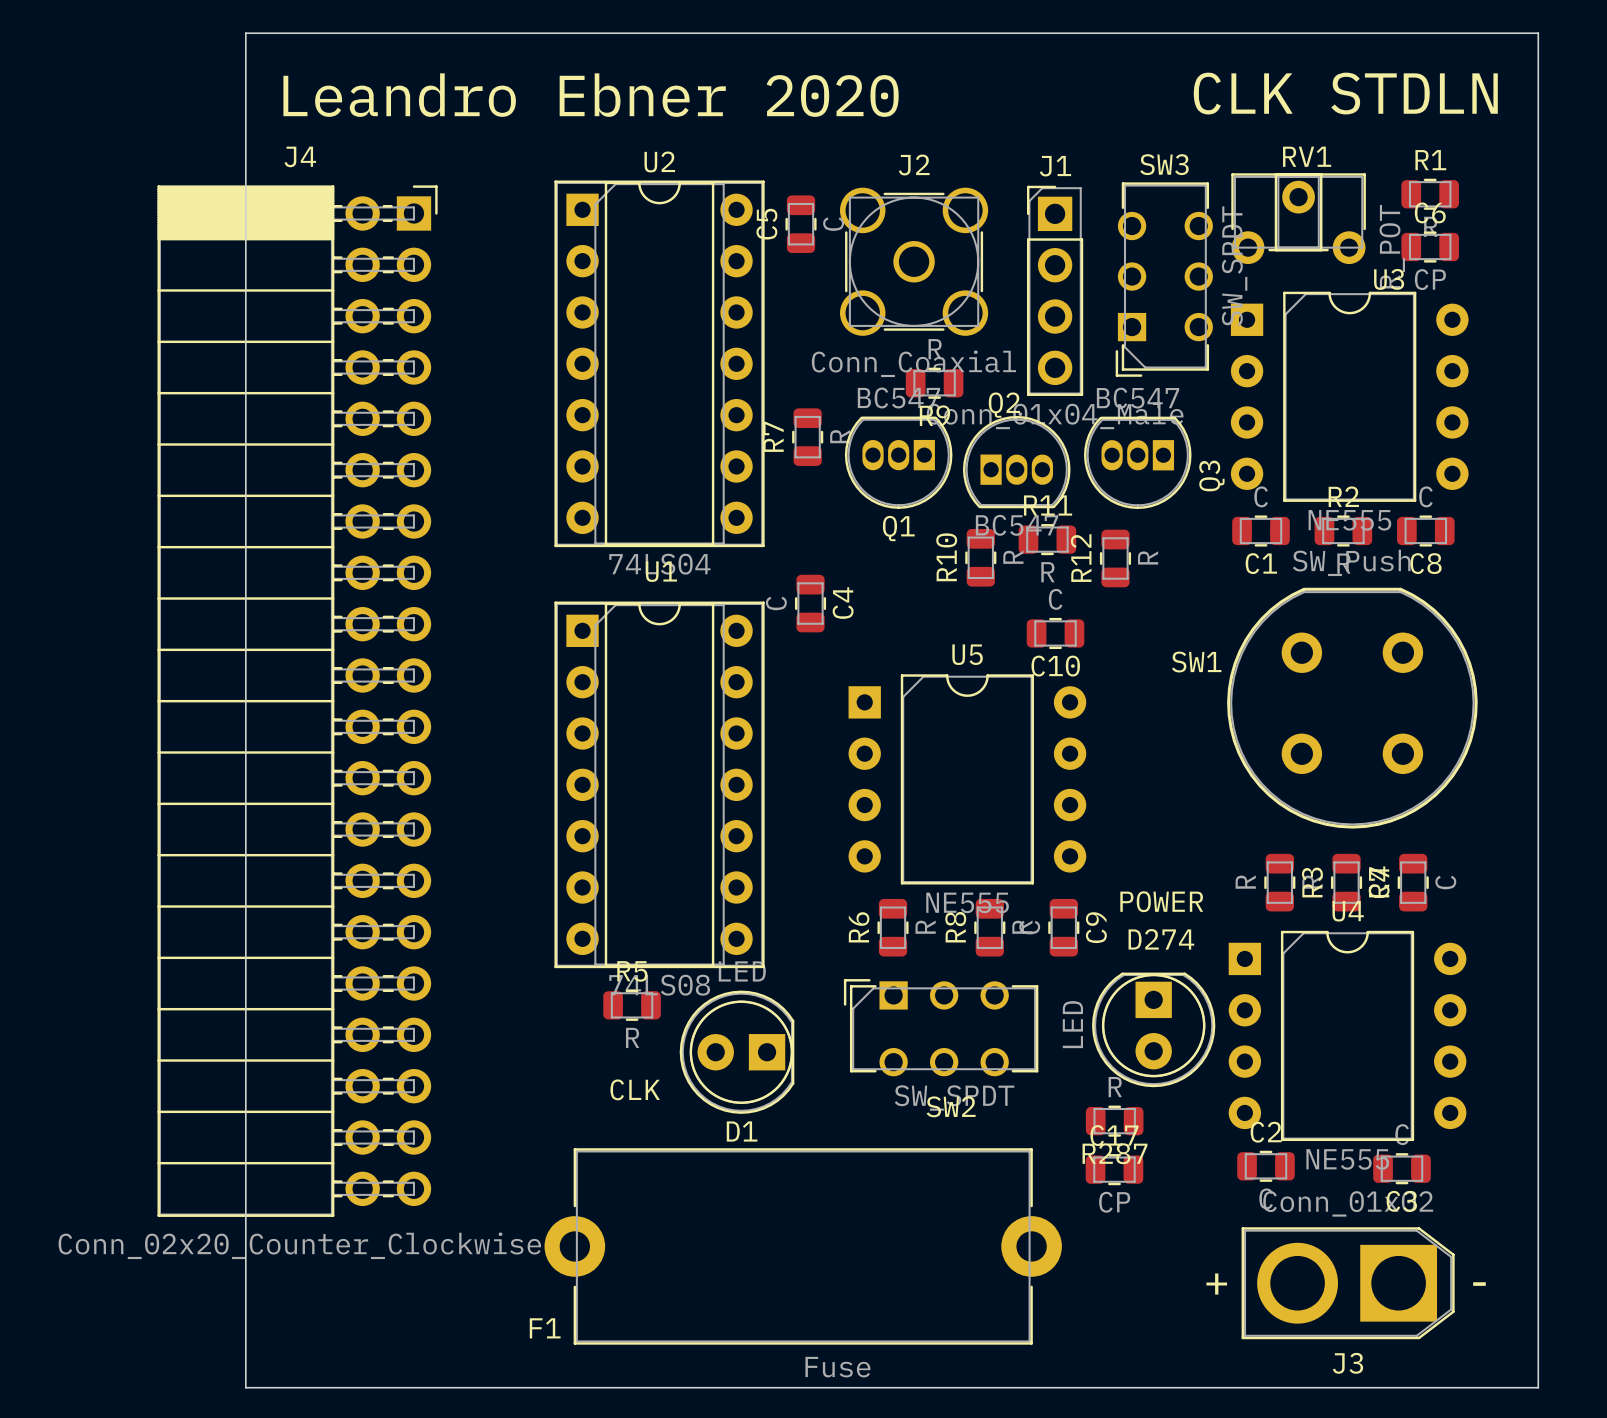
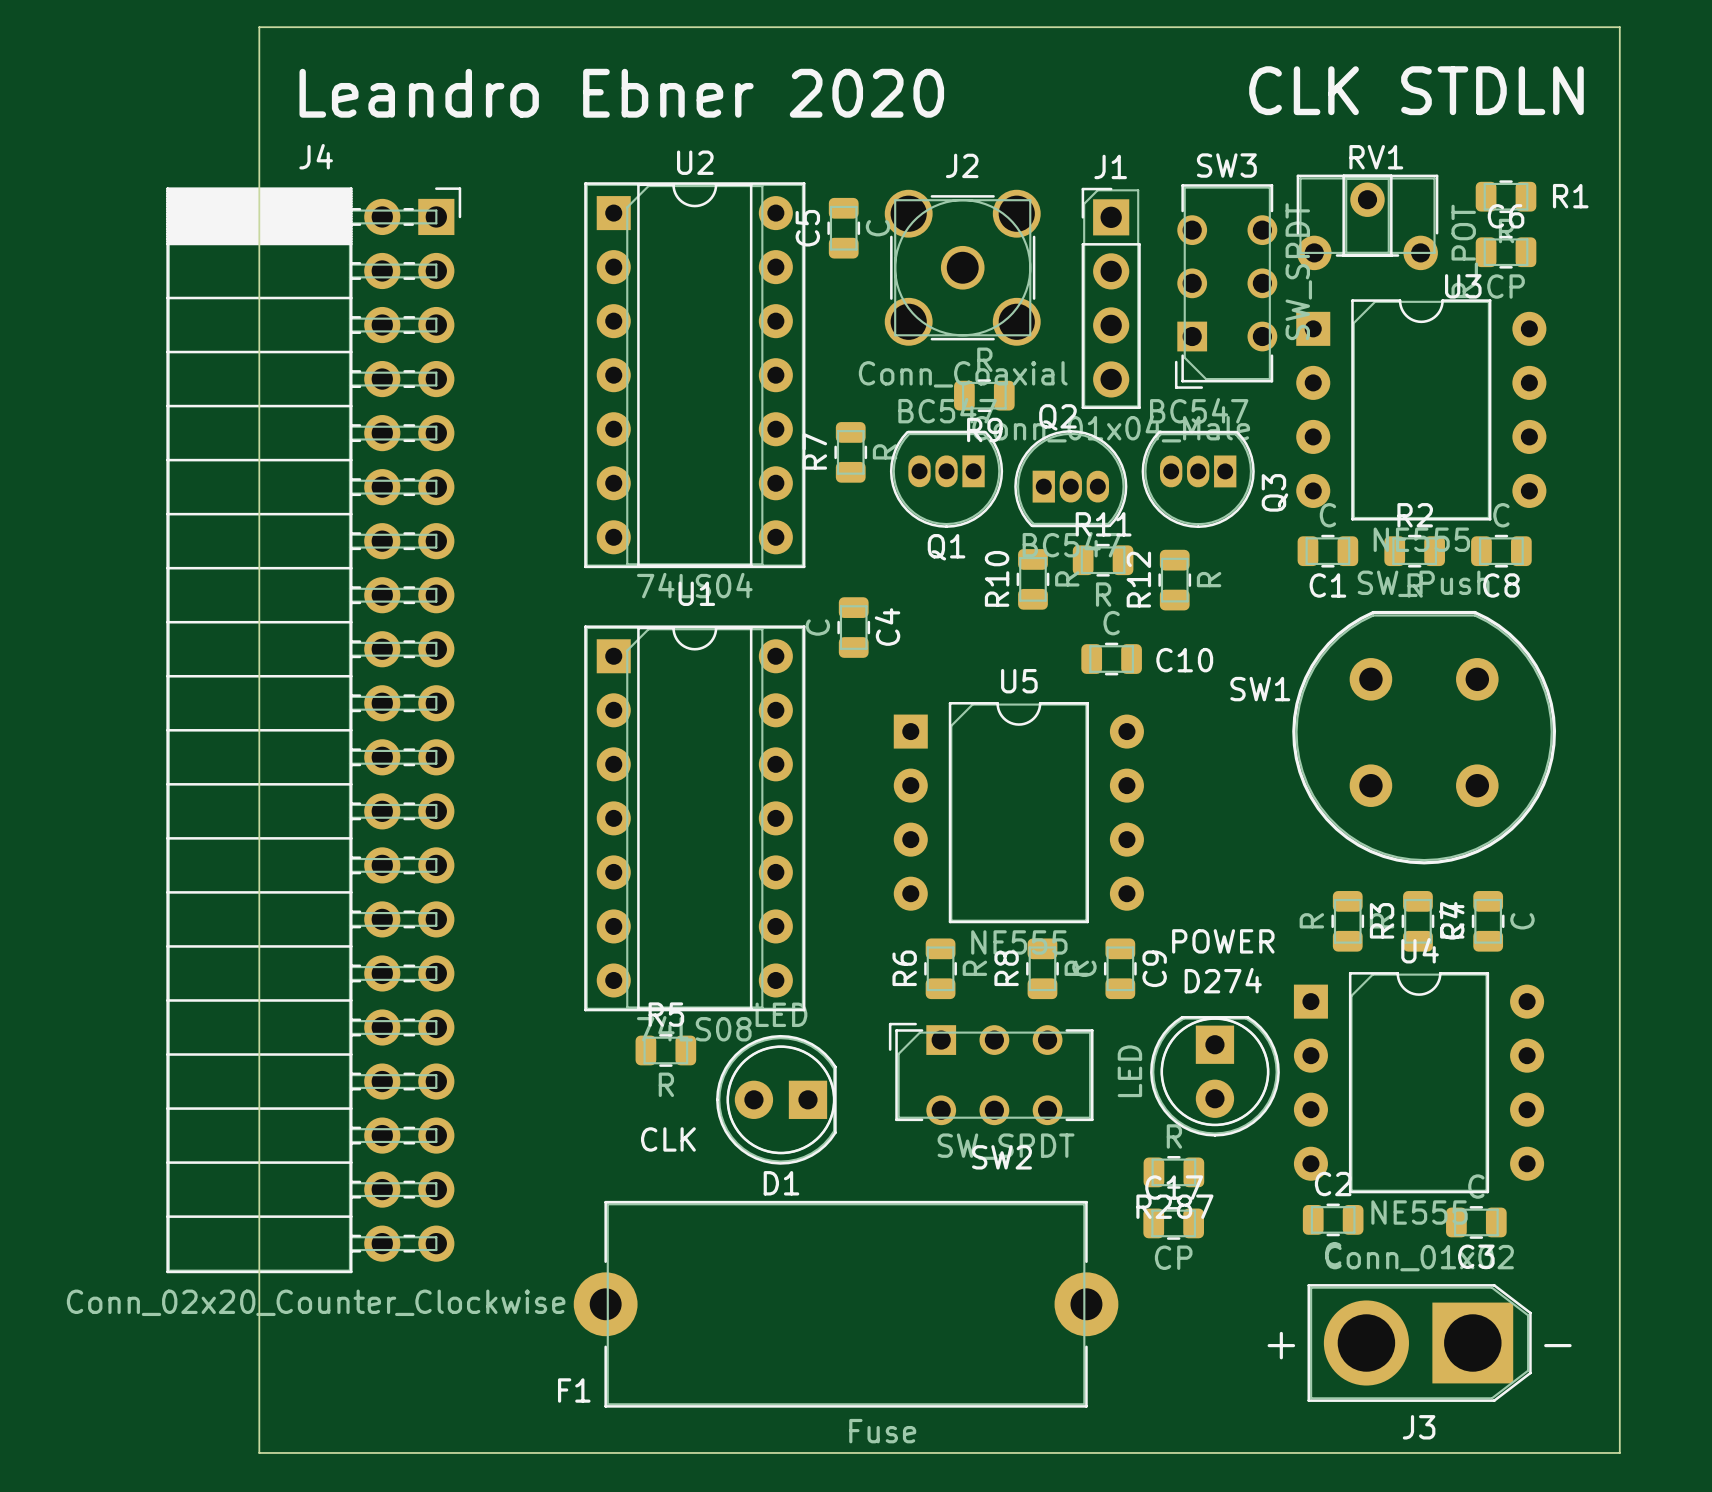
R1 name position: R1 (1430, 160) -> R1 (1570, 196)
C10 name position: C10 (1055, 666) -> C10 (1184, 660)

